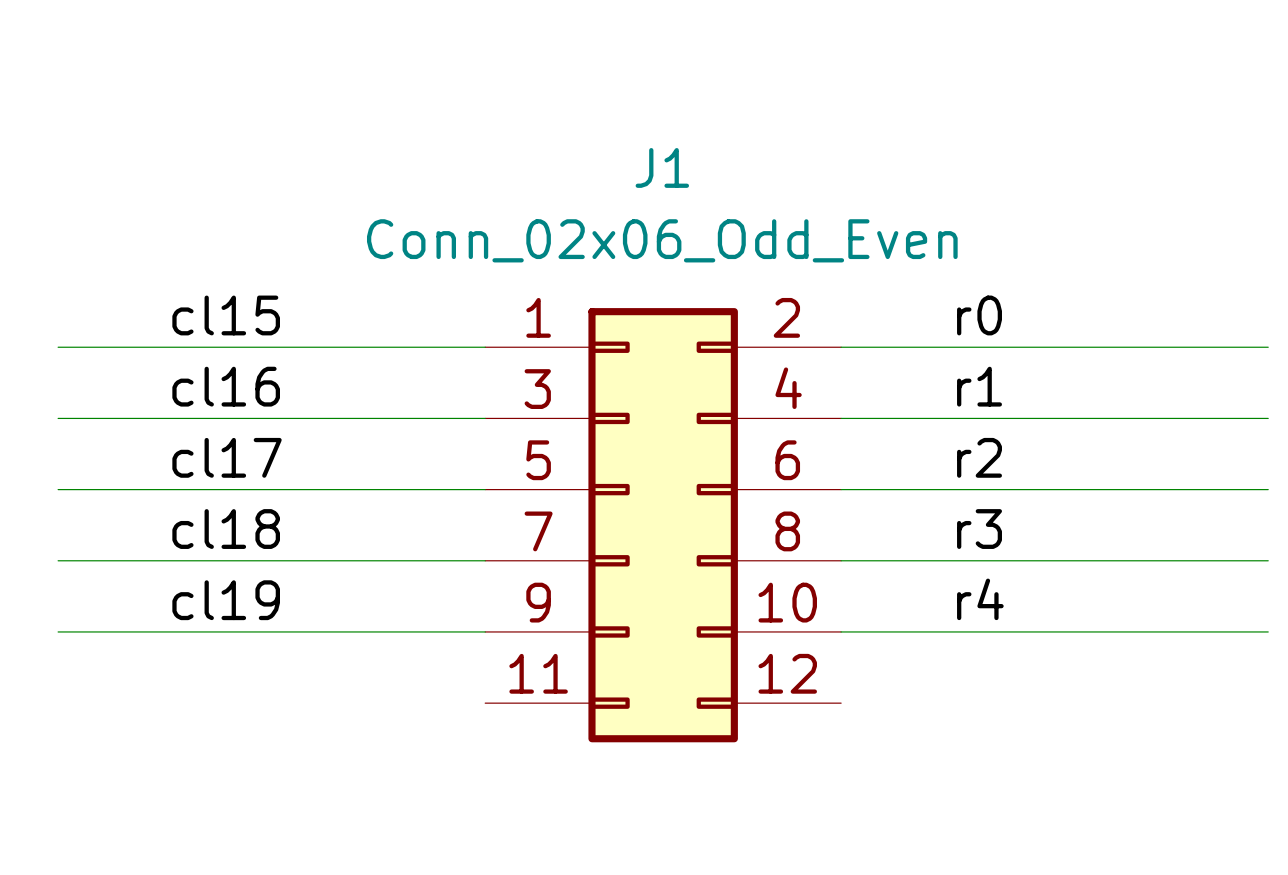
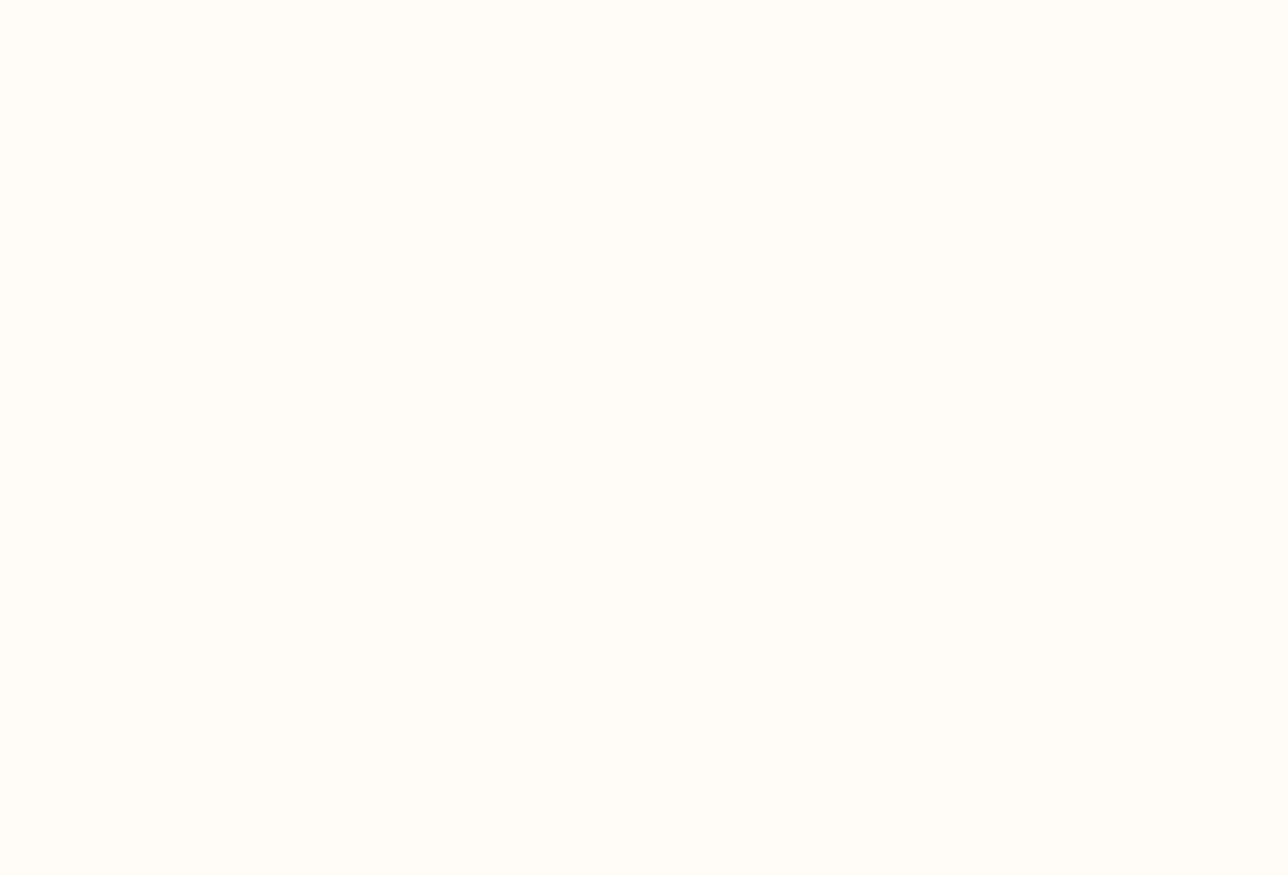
label: cl15 (226, 315) -> none
label: r0 (979, 315) -> none
wire: (58, 347) (485, 347) -> none
wire: (841, 347) (1268, 347) -> none
label: cl16 (226, 386) -> none
label: r1 (979, 386) -> none
wire: (58, 418) (485, 418) -> none
wire: (841, 418) (1268, 418) -> none
label: cl17 (227, 457) -> none
label: r2 (979, 457) -> none
wire: (58, 489) (485, 489) -> none
wire: (841, 489) (1268, 489) -> none
J1: Conn_02x06_Odd_Even (663, 525) -> none
label: cl18 (226, 529) -> none
label: r3 (979, 529) -> none
wire: (58, 560) (485, 560) -> none
wire: (841, 560) (1268, 560) -> none
label: r4 (980, 599) -> none
label: cl19 (226, 600) -> none
wire: (58, 631) (485, 631) -> none
wire: (841, 631) (1268, 631) -> none

